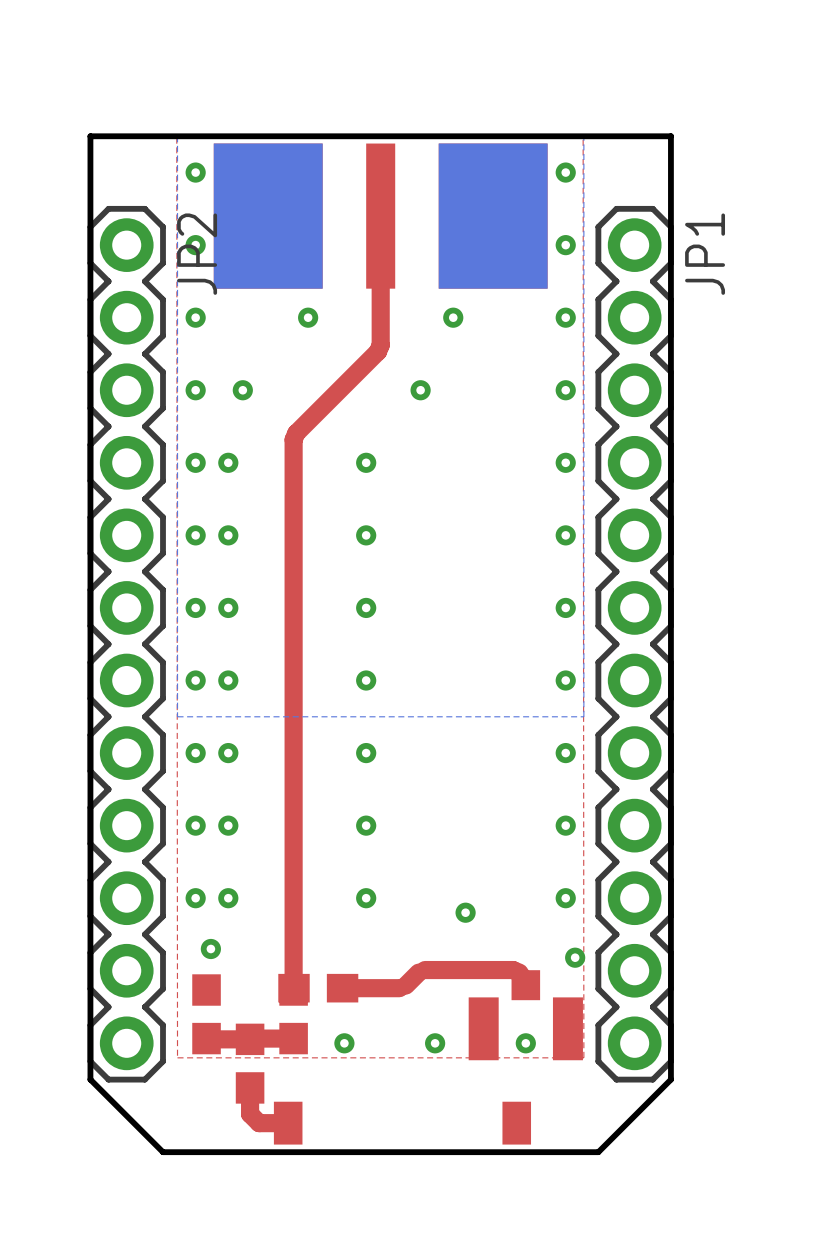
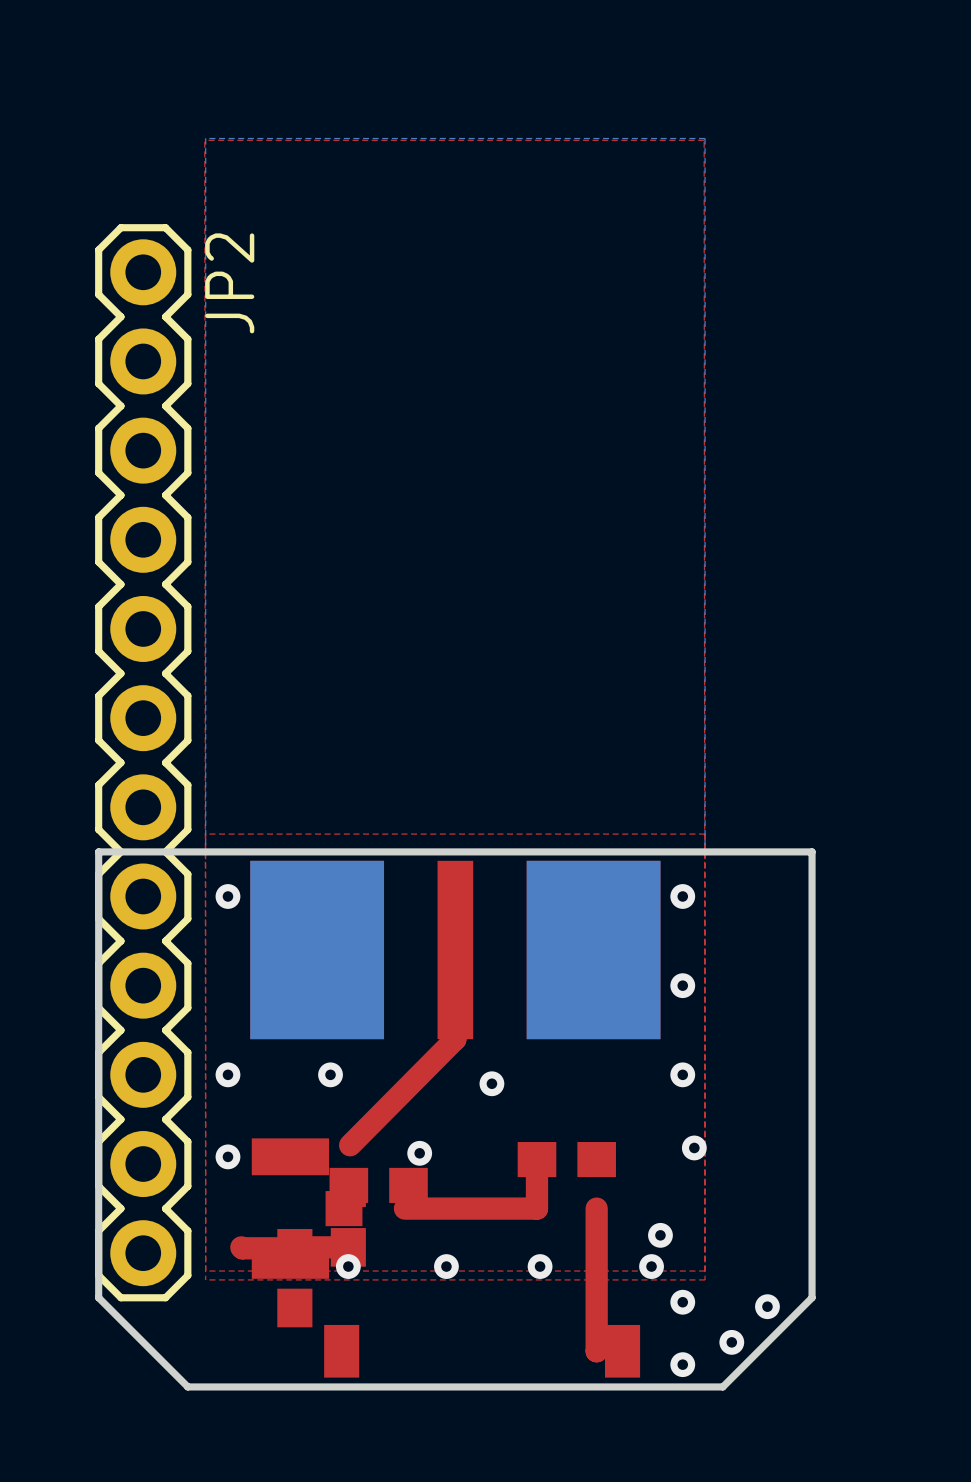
via: (195, 172) -> none
via: (565, 172) -> none
top track: (380, 216) (380, 345) (378, 351) (296, 433) (293, 439) (293, 990) -> none
part position: (380, 216) -> (455, 950)
via: (195, 245) -> none
via: (565, 245) -> none
via: (195, 317) -> none
via: (308, 317) -> none
via: (453, 317) -> none
via: (565, 317) -> none
via: (195, 390) -> none
via: (242, 390) -> none
via: (420, 390) -> none
via: (565, 390) -> none
via: (195, 462) -> none
via: (228, 462) -> none
via: (366, 462) -> none
via: (565, 462) -> none
via: (195, 535) -> none
via: (228, 535) -> none
via: (366, 535) -> none
via: (565, 535) -> none
via: (195, 607) -> none
via: (228, 607) -> none
via: (366, 607) -> none
via: (565, 607) -> none
JP1: (634, 644) -> none
via: (195, 680) -> none
via: (228, 680) -> none
via: (366, 680) -> none
via: (565, 680) -> none
top zone outline: none -> (705, 834) (205, 834) (205, 1279) (705, 1279) (705, 834)
board edge: (670, 716) (670, 136) (90, 136) (90, 716) -> (812, 851) (98, 851)
via: (228, 753) -> none
via: (366, 753) -> none
via: (195, 825) -> none
via: (228, 825) -> none
via: (366, 825) -> none
top track: none -> (455, 1034) (455, 1039) (350, 1145)
via: (228, 898) -> none
via: none -> (330, 1074)
via: (366, 898) -> none
via: none -> (491, 1083)
via: (465, 912) -> none
via position: (210, 948) -> (227, 1156)
via: none -> (419, 1153)
top track: none -> (536, 1159) (536, 1208) (404, 1208)
top track: (525, 985) (525, 979) (519, 972) (512, 970) (425, 970) (418, 972) (405, 985) (399, 988) (342, 988) -> none
top track: none -> (596, 1208) (596, 1351)
part rotation: 0° (206, 1014) -> 90° clockwise (566, 1159)
part position: (206, 1014) -> (566, 1159)
part rotation: 0° (525, 1015) -> 90° clockwise (307, 1208)
part position: (525, 1015) -> (307, 1208)
via: none -> (660, 1235)
via: (344, 1043) -> none
via position: (435, 1043) -> (540, 1266)
via position: (525, 1043) -> (651, 1266)
via: none -> (348, 1266)
via: none -> (446, 1266)
via: none -> (682, 1302)
via: none -> (767, 1306)
top track: (250, 1087) (250, 1114) (259, 1123) (288, 1123) -> none
via: none -> (731, 1342)
via: none -> (682, 1364)

